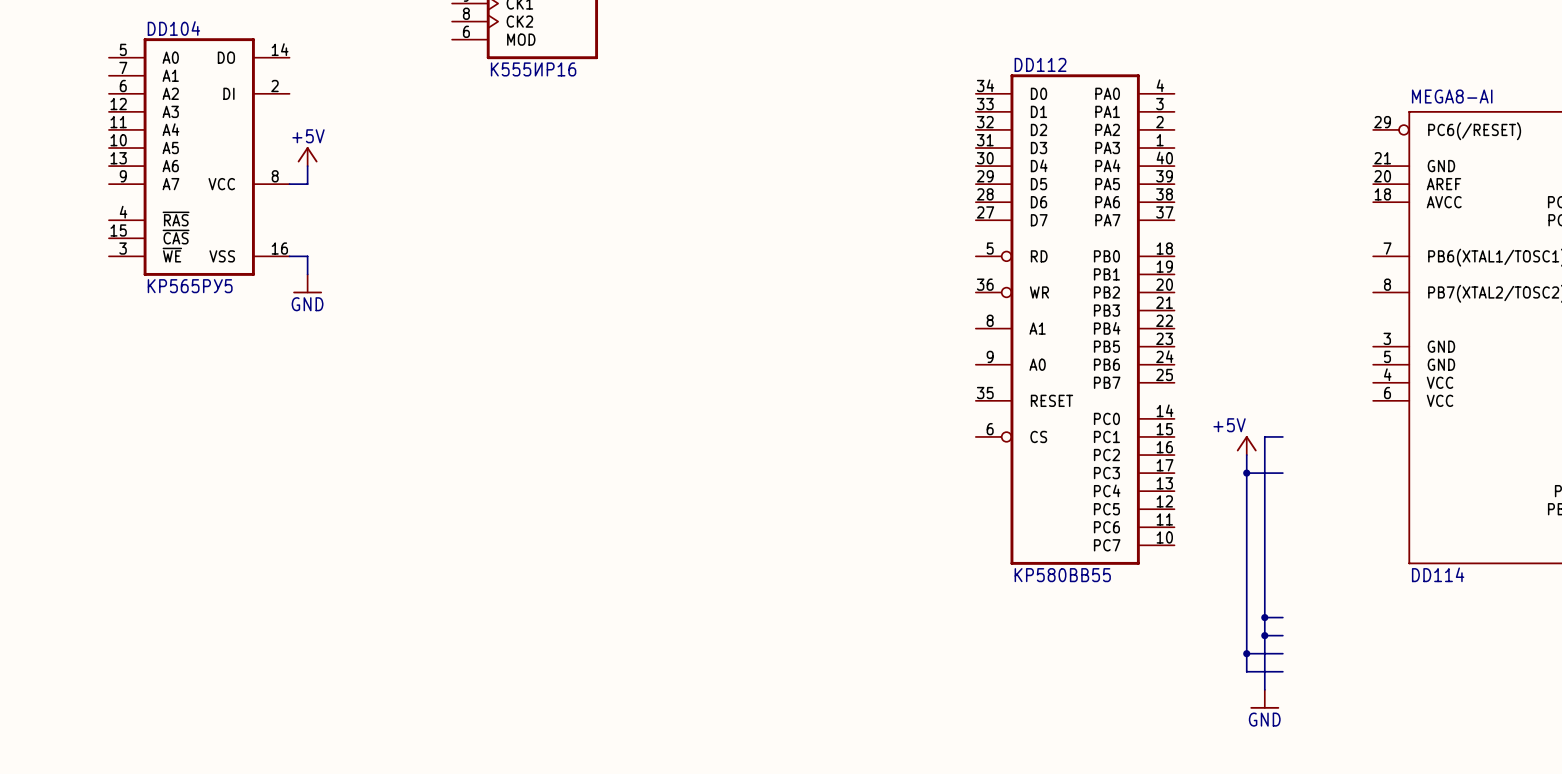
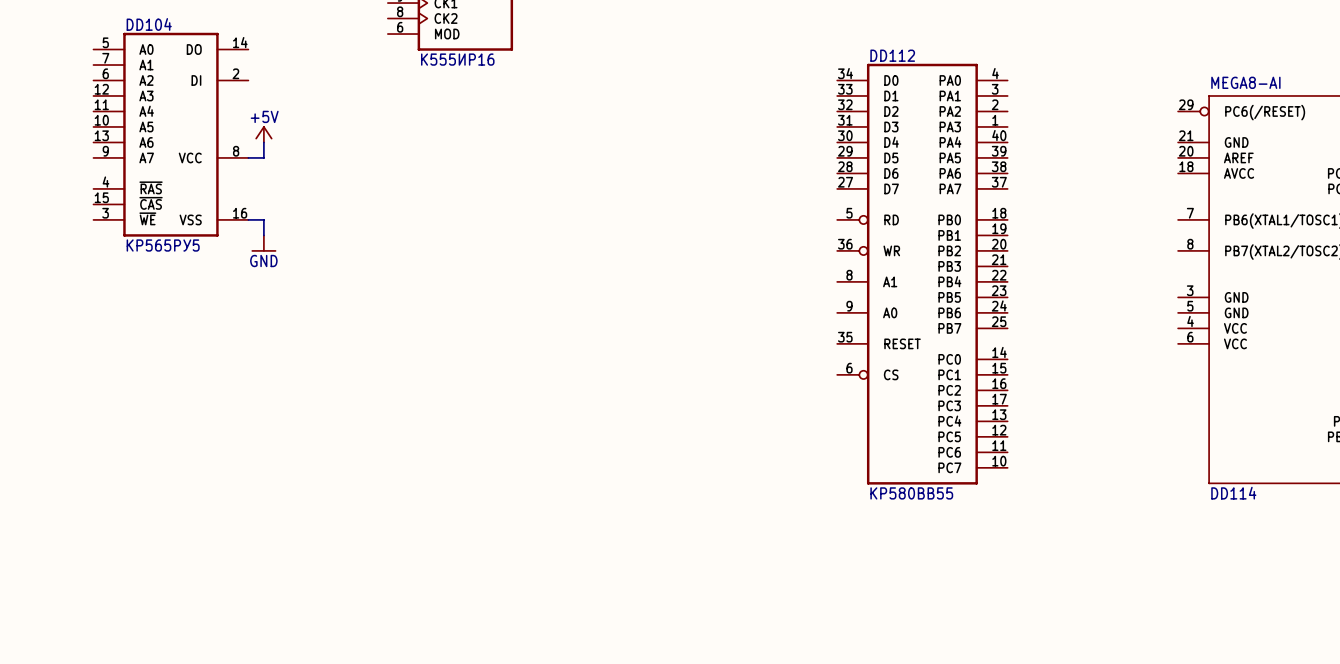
wire: (1282, 436) (1264, 436) (1264, 689) -> none
power symbol: +5V (1246, 445) -> none
wire: (1246, 455) (1246, 671) (1282, 671) -> none
wire: (1246, 473) (1282, 473) -> none
junction: (1246, 473) -> none
wire: (1264, 617) (1282, 617) -> none
junction: (1264, 617) -> none
wire: (1264, 635) (1282, 635) -> none
junction: (1264, 635) -> none
wire: (1246, 653) (1282, 653) -> none
junction: (1246, 653) -> none
power symbol: GND (1264, 699) -> none

